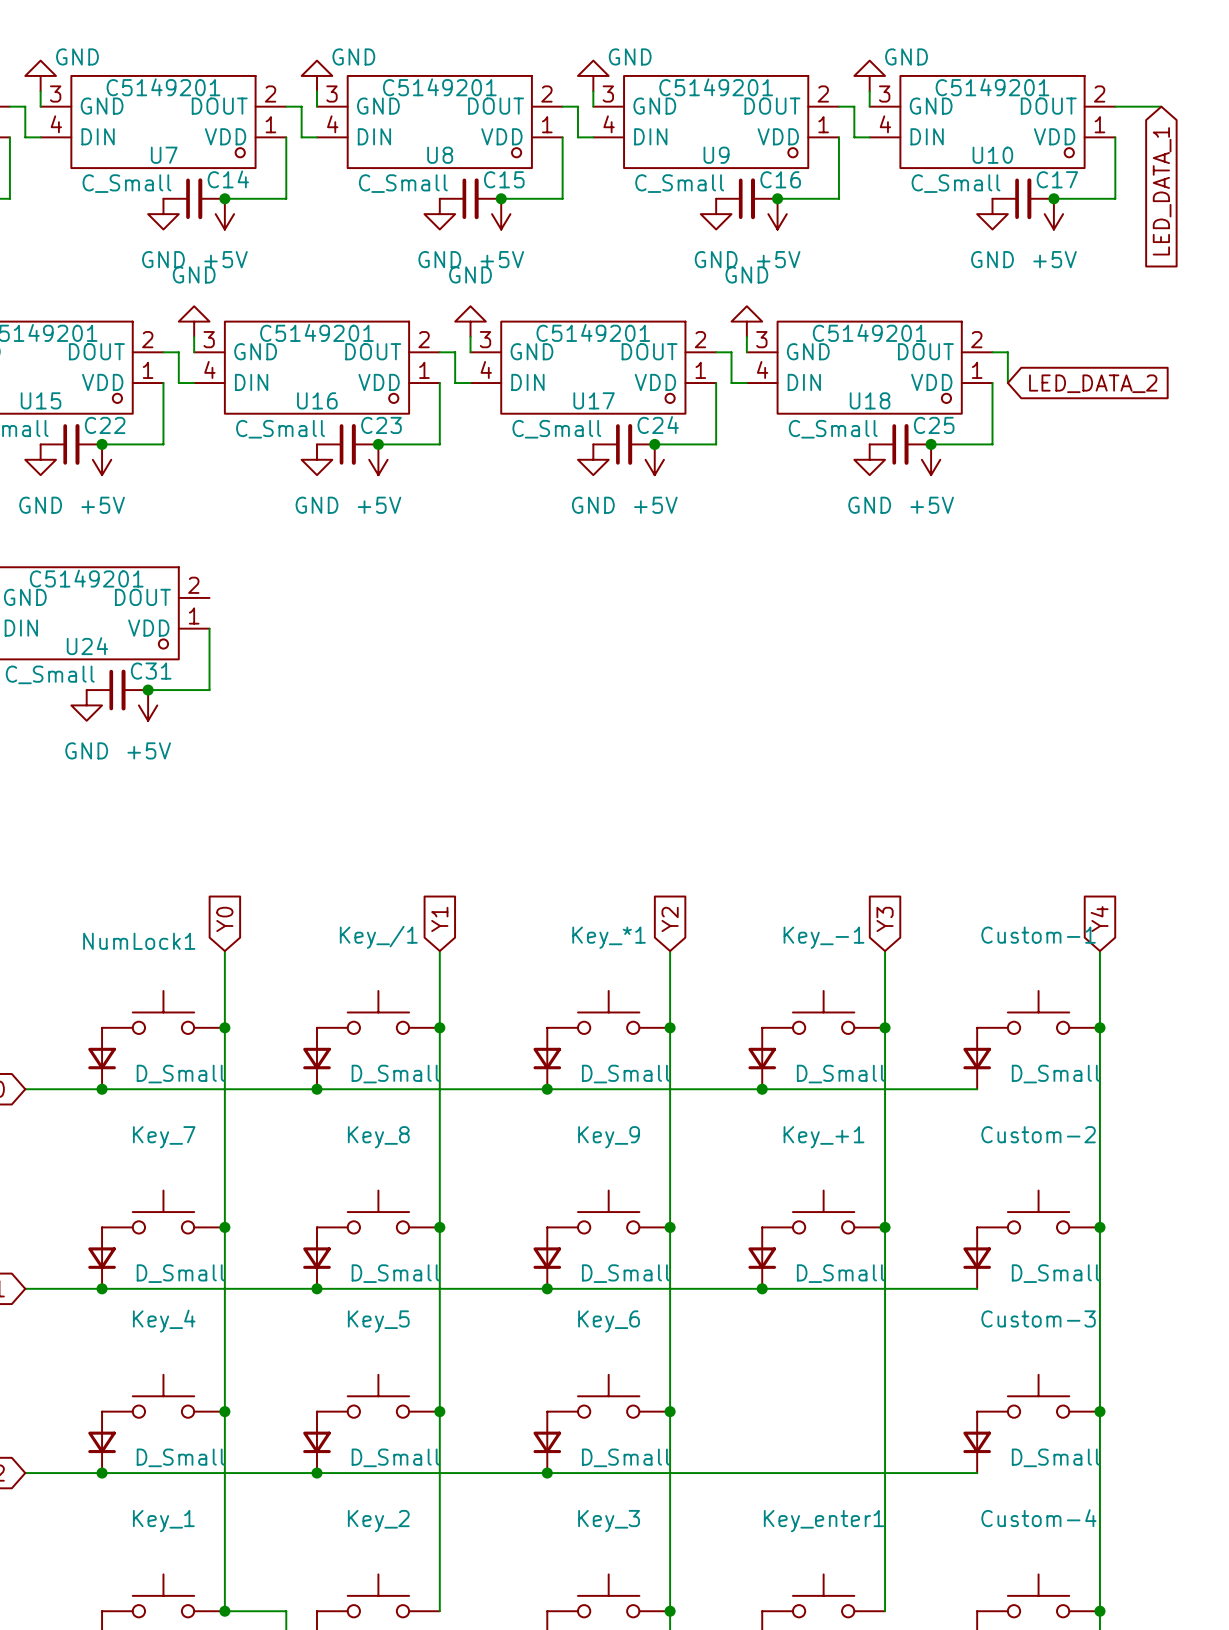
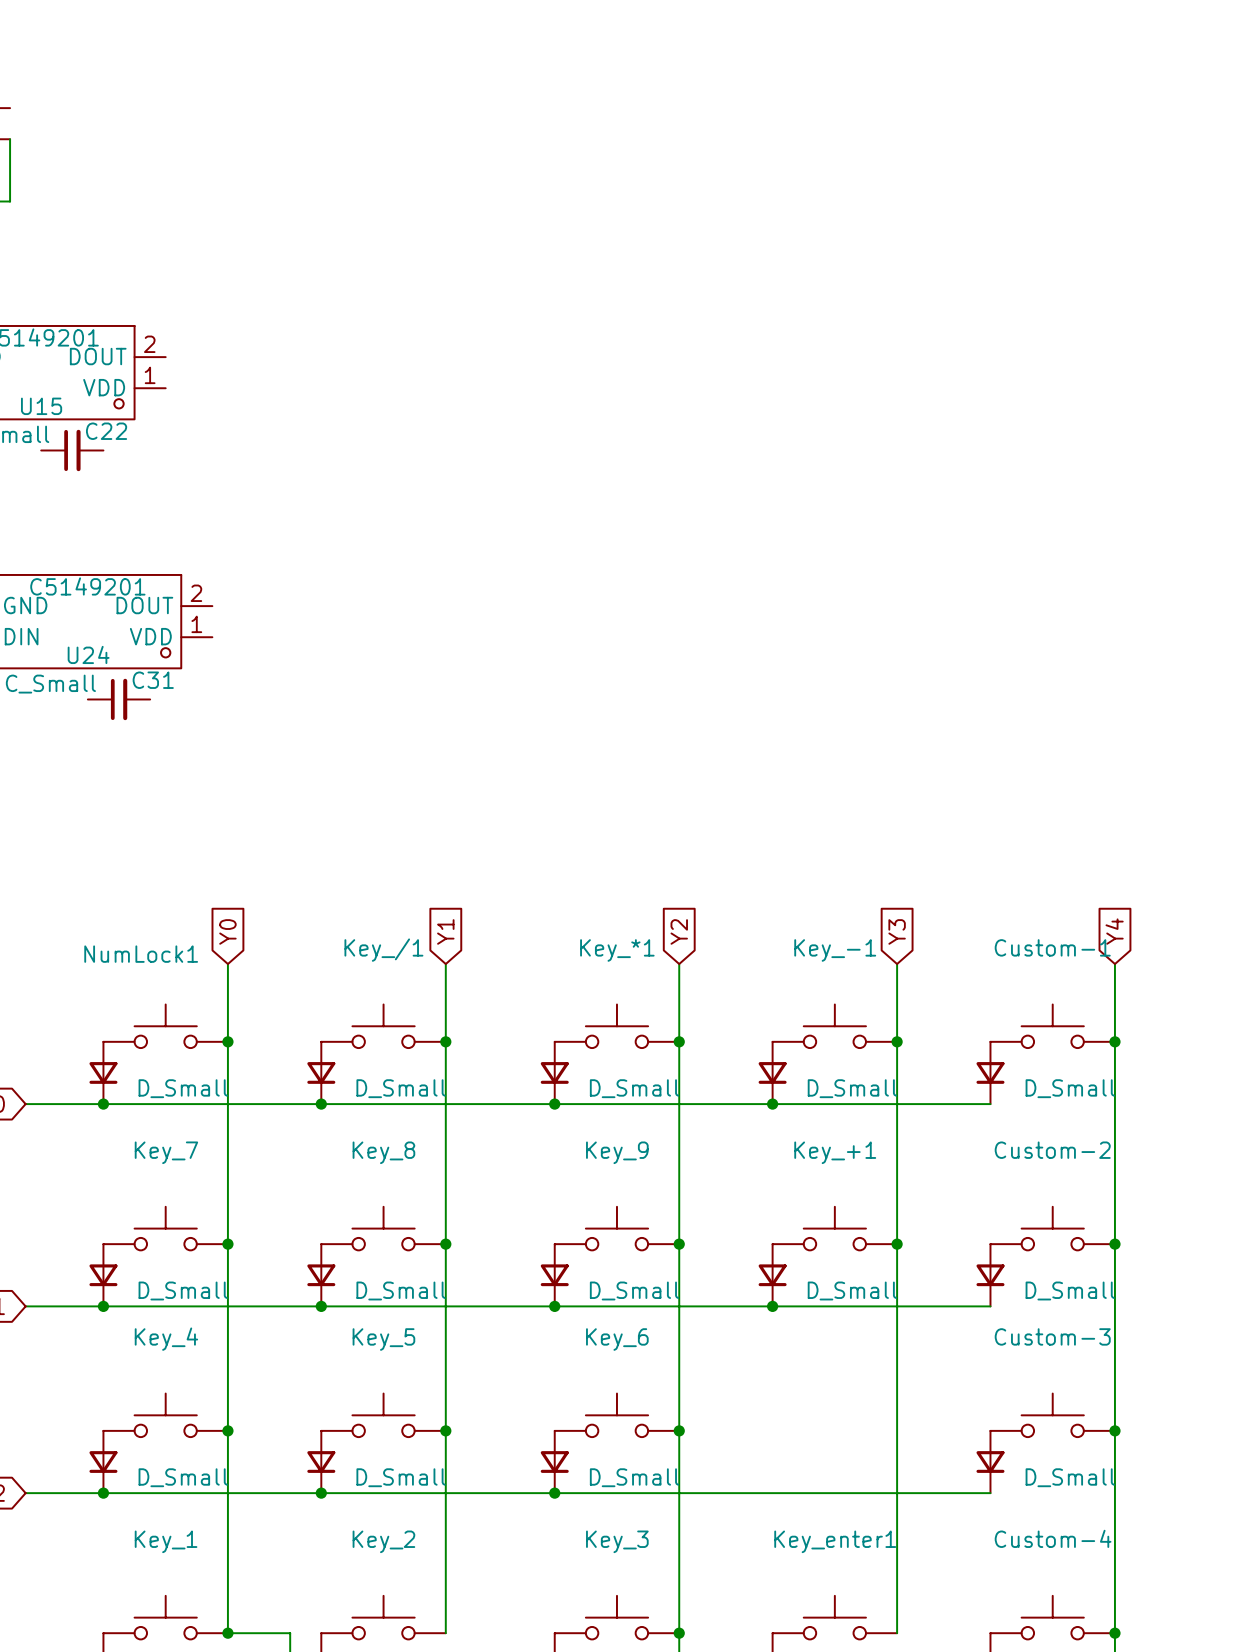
power symbol: GND (40, 75) -> none
power symbol: GND (316, 75) -> none
power symbol: GND (593, 75) -> none
power symbol: GND (869, 75) -> none
wire: (40, 91) (40, 106) -> none
wire: (316, 91) (316, 106) -> none
wire: (593, 91) (593, 106) -> none
wire: (869, 91) (869, 106) -> none
wire: (9, 106) (25, 106) (25, 137) (40, 137) -> none
wire: (286, 106) (301, 106) (301, 137) (316, 137) -> none
wire: (562, 106) (577, 106) (577, 137) (593, 137) -> none
wire: (838, 106) (854, 106) (854, 137) (869, 137) -> none
wire: (1115, 106) (1161, 106) -> none
U7: (163, 122) -> none
U8: (439, 122) -> none
U9: (716, 122) -> none
U10: (992, 122) -> none
wire: (286, 137) (286, 198) (224, 198) -> none
wire: (562, 137) (562, 198) (501, 198) -> none
wire: (838, 137) (838, 198) (777, 198) -> none
wire: (1115, 137) (1115, 198) (1053, 198) -> none
global label: LED_DATA_1 (1162, 191) -> none
C14: C_Small (194, 198) -> none
junction: (224, 198) -> none
C15: C_Small (470, 198) -> none
junction: (501, 198) -> none
C16: C_Small (746, 198) -> none
junction: (777, 198) -> none
C17: C_Small (1023, 198) -> none
junction: (1053, 198) -> none
power symbol: GND (163, 214) -> none
power symbol: +5V (224, 214) -> none
power symbol: GND (439, 214) -> none
power symbol: +5V (501, 214) -> none
power symbol: GND (716, 214) -> none
power symbol: +5V (777, 214) -> none
power symbol: GND (992, 214) -> none
power symbol: +5V (1053, 214) -> none
power symbol: GND (194, 321) -> none
power symbol: GND (470, 321) -> none
power symbol: GND (746, 321) -> none
wire: (194, 336) (194, 352) -> none
wire: (470, 336) (470, 352) -> none
wire: (746, 336) (746, 352) -> none
wire: (163, 352) (178, 352) (178, 383) (194, 383) -> none
wire: (439, 352) (455, 352) (455, 383) (470, 383) -> none
wire: (716, 352) (731, 352) (731, 383) (746, 383) -> none
wire: (992, 352) (1007, 352) (1007, 383) -> none
U16: (316, 367) -> none
U17: (593, 367) -> none
U18: (869, 367) -> none
wire: (163, 383) (163, 444) (102, 444) -> none
wire: (439, 383) (439, 444) (378, 444) -> none
wire: (716, 383) (716, 444) (654, 444) -> none
wire: (992, 383) (992, 444) (931, 444) -> none
global label: LED_DATA_2 (1093, 383) -> none
junction: (102, 444) -> none
C23: C_Small (347, 444) -> none
junction: (378, 444) -> none
C24: C_Small (624, 444) -> none
junction: (654, 444) -> none
C25: C_Small (900, 444) -> none
junction: (931, 444) -> none
power symbol: GND (40, 459) -> none
power symbol: +5V (102, 459) -> none
power symbol: GND (316, 459) -> none
power symbol: +5V (378, 459) -> none
power symbol: GND (593, 459) -> none
power symbol: +5V (654, 459) -> none
power symbol: GND (869, 459) -> none
power symbol: +5V (931, 459) -> none
wire: (209, 628) (209, 690) (148, 690) -> none
junction: (148, 690) -> none
power symbol: GND (86, 705) -> none
power symbol: +5V (148, 705) -> none

